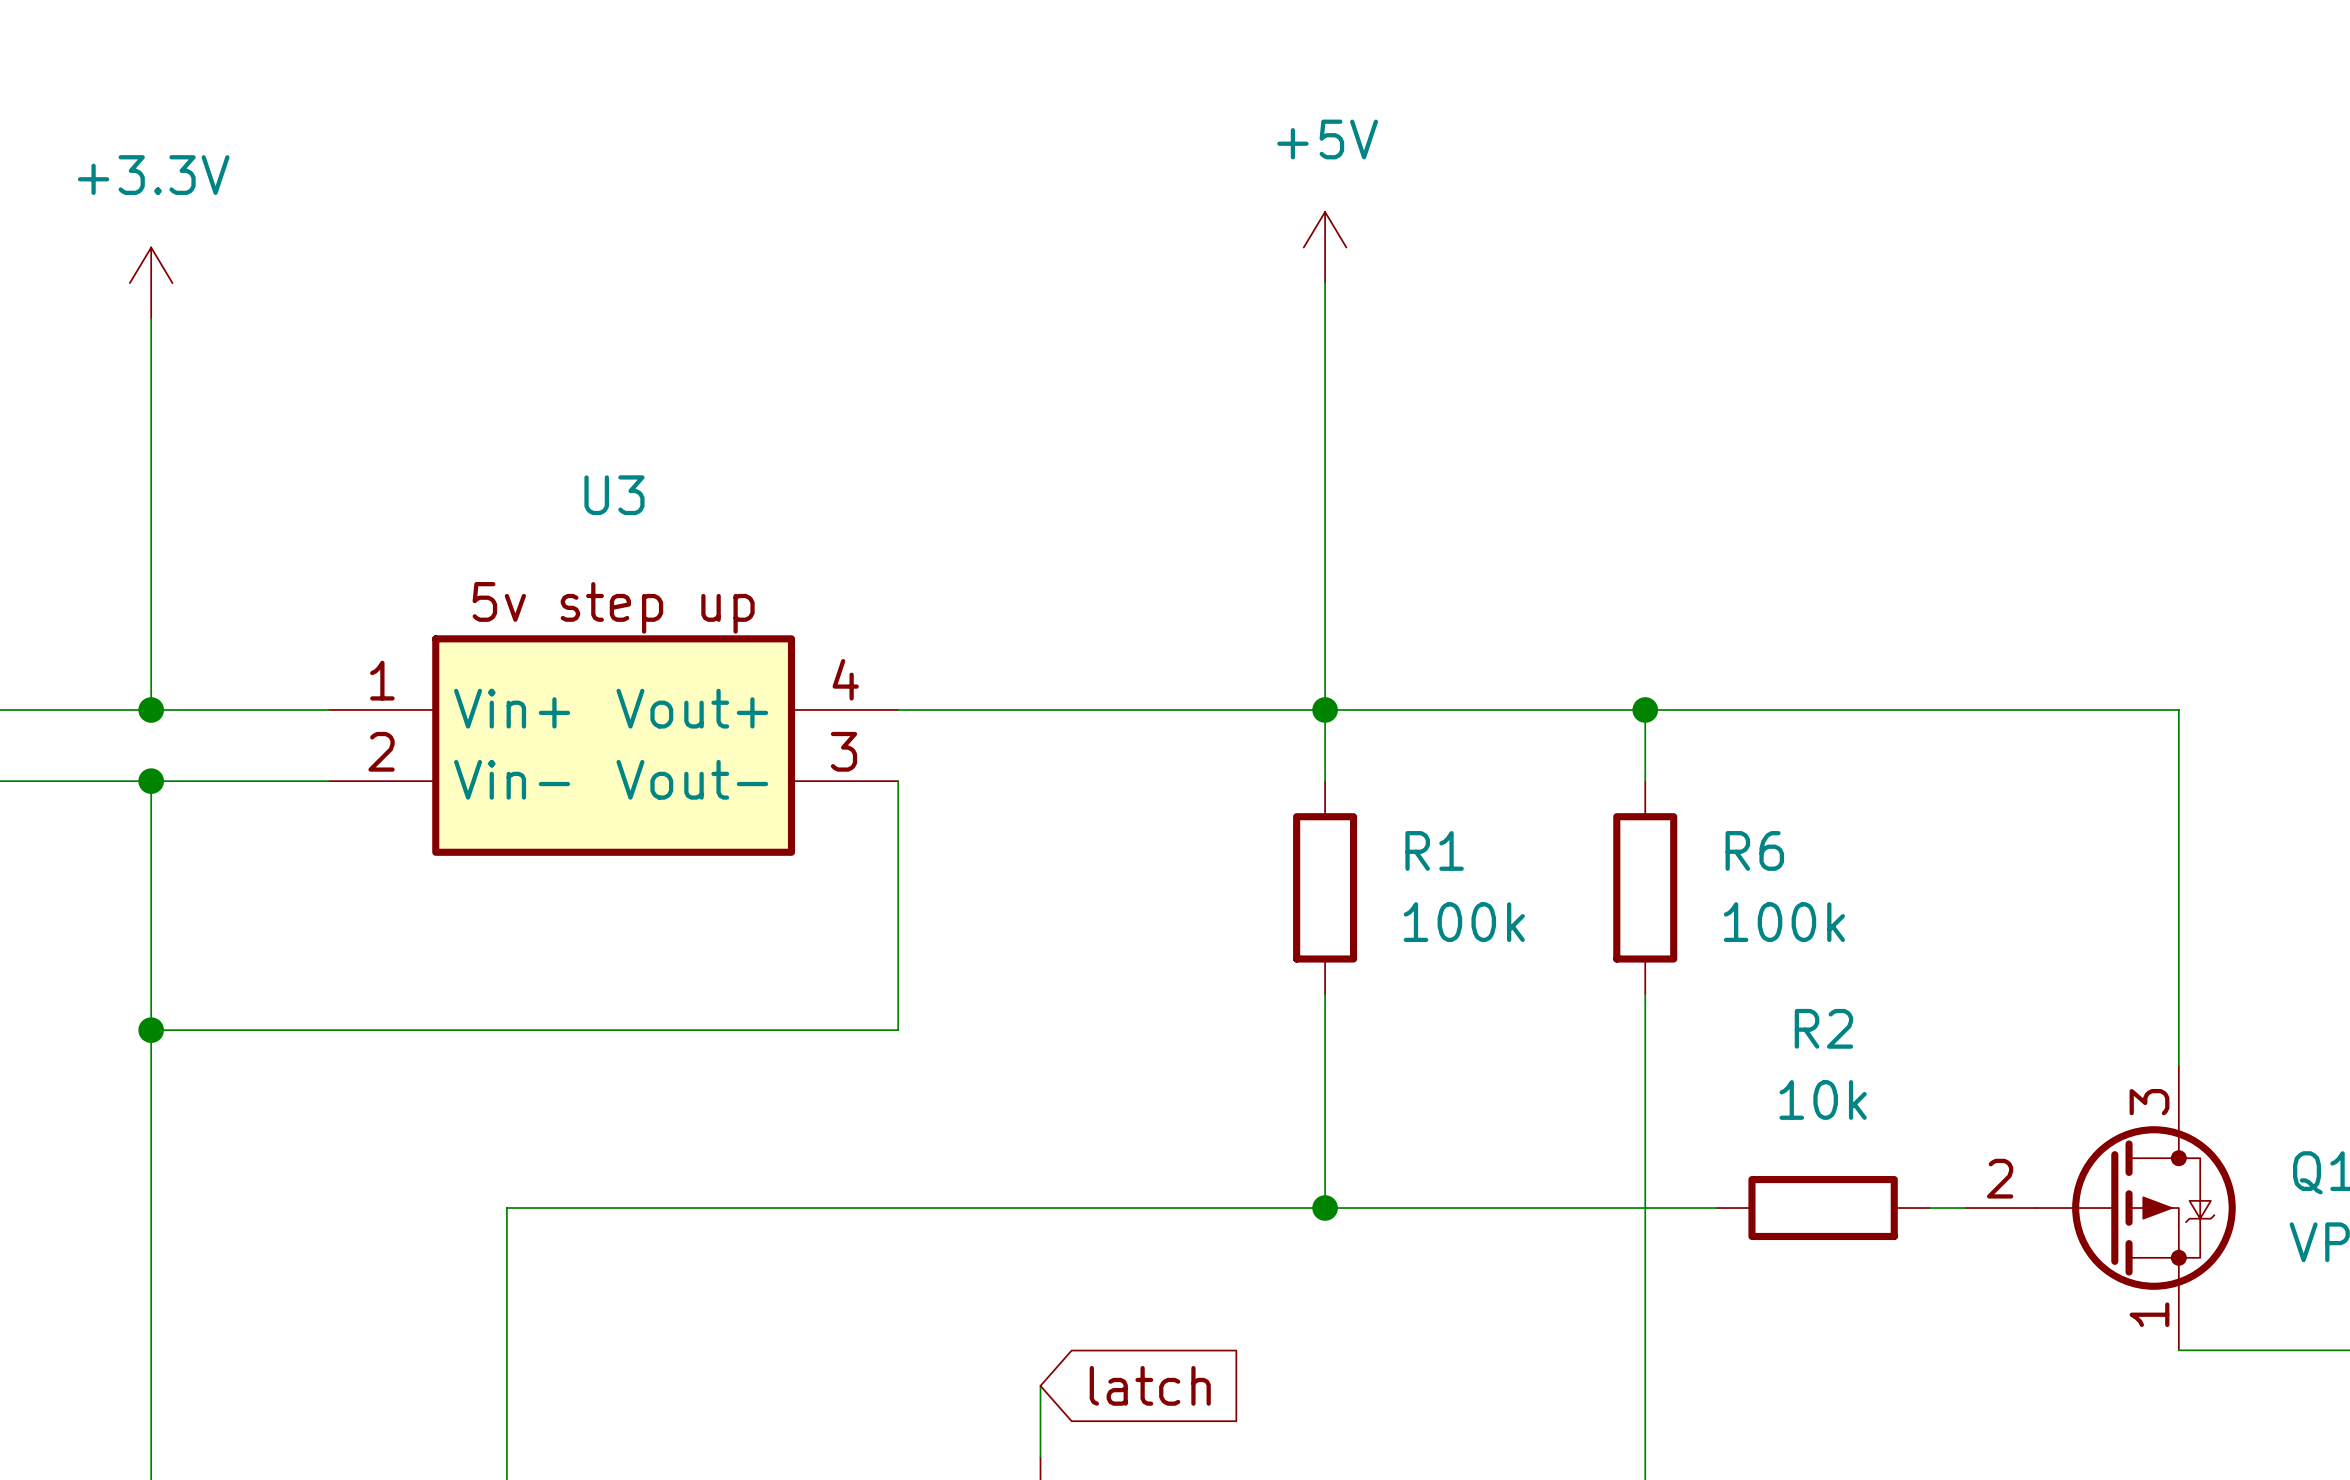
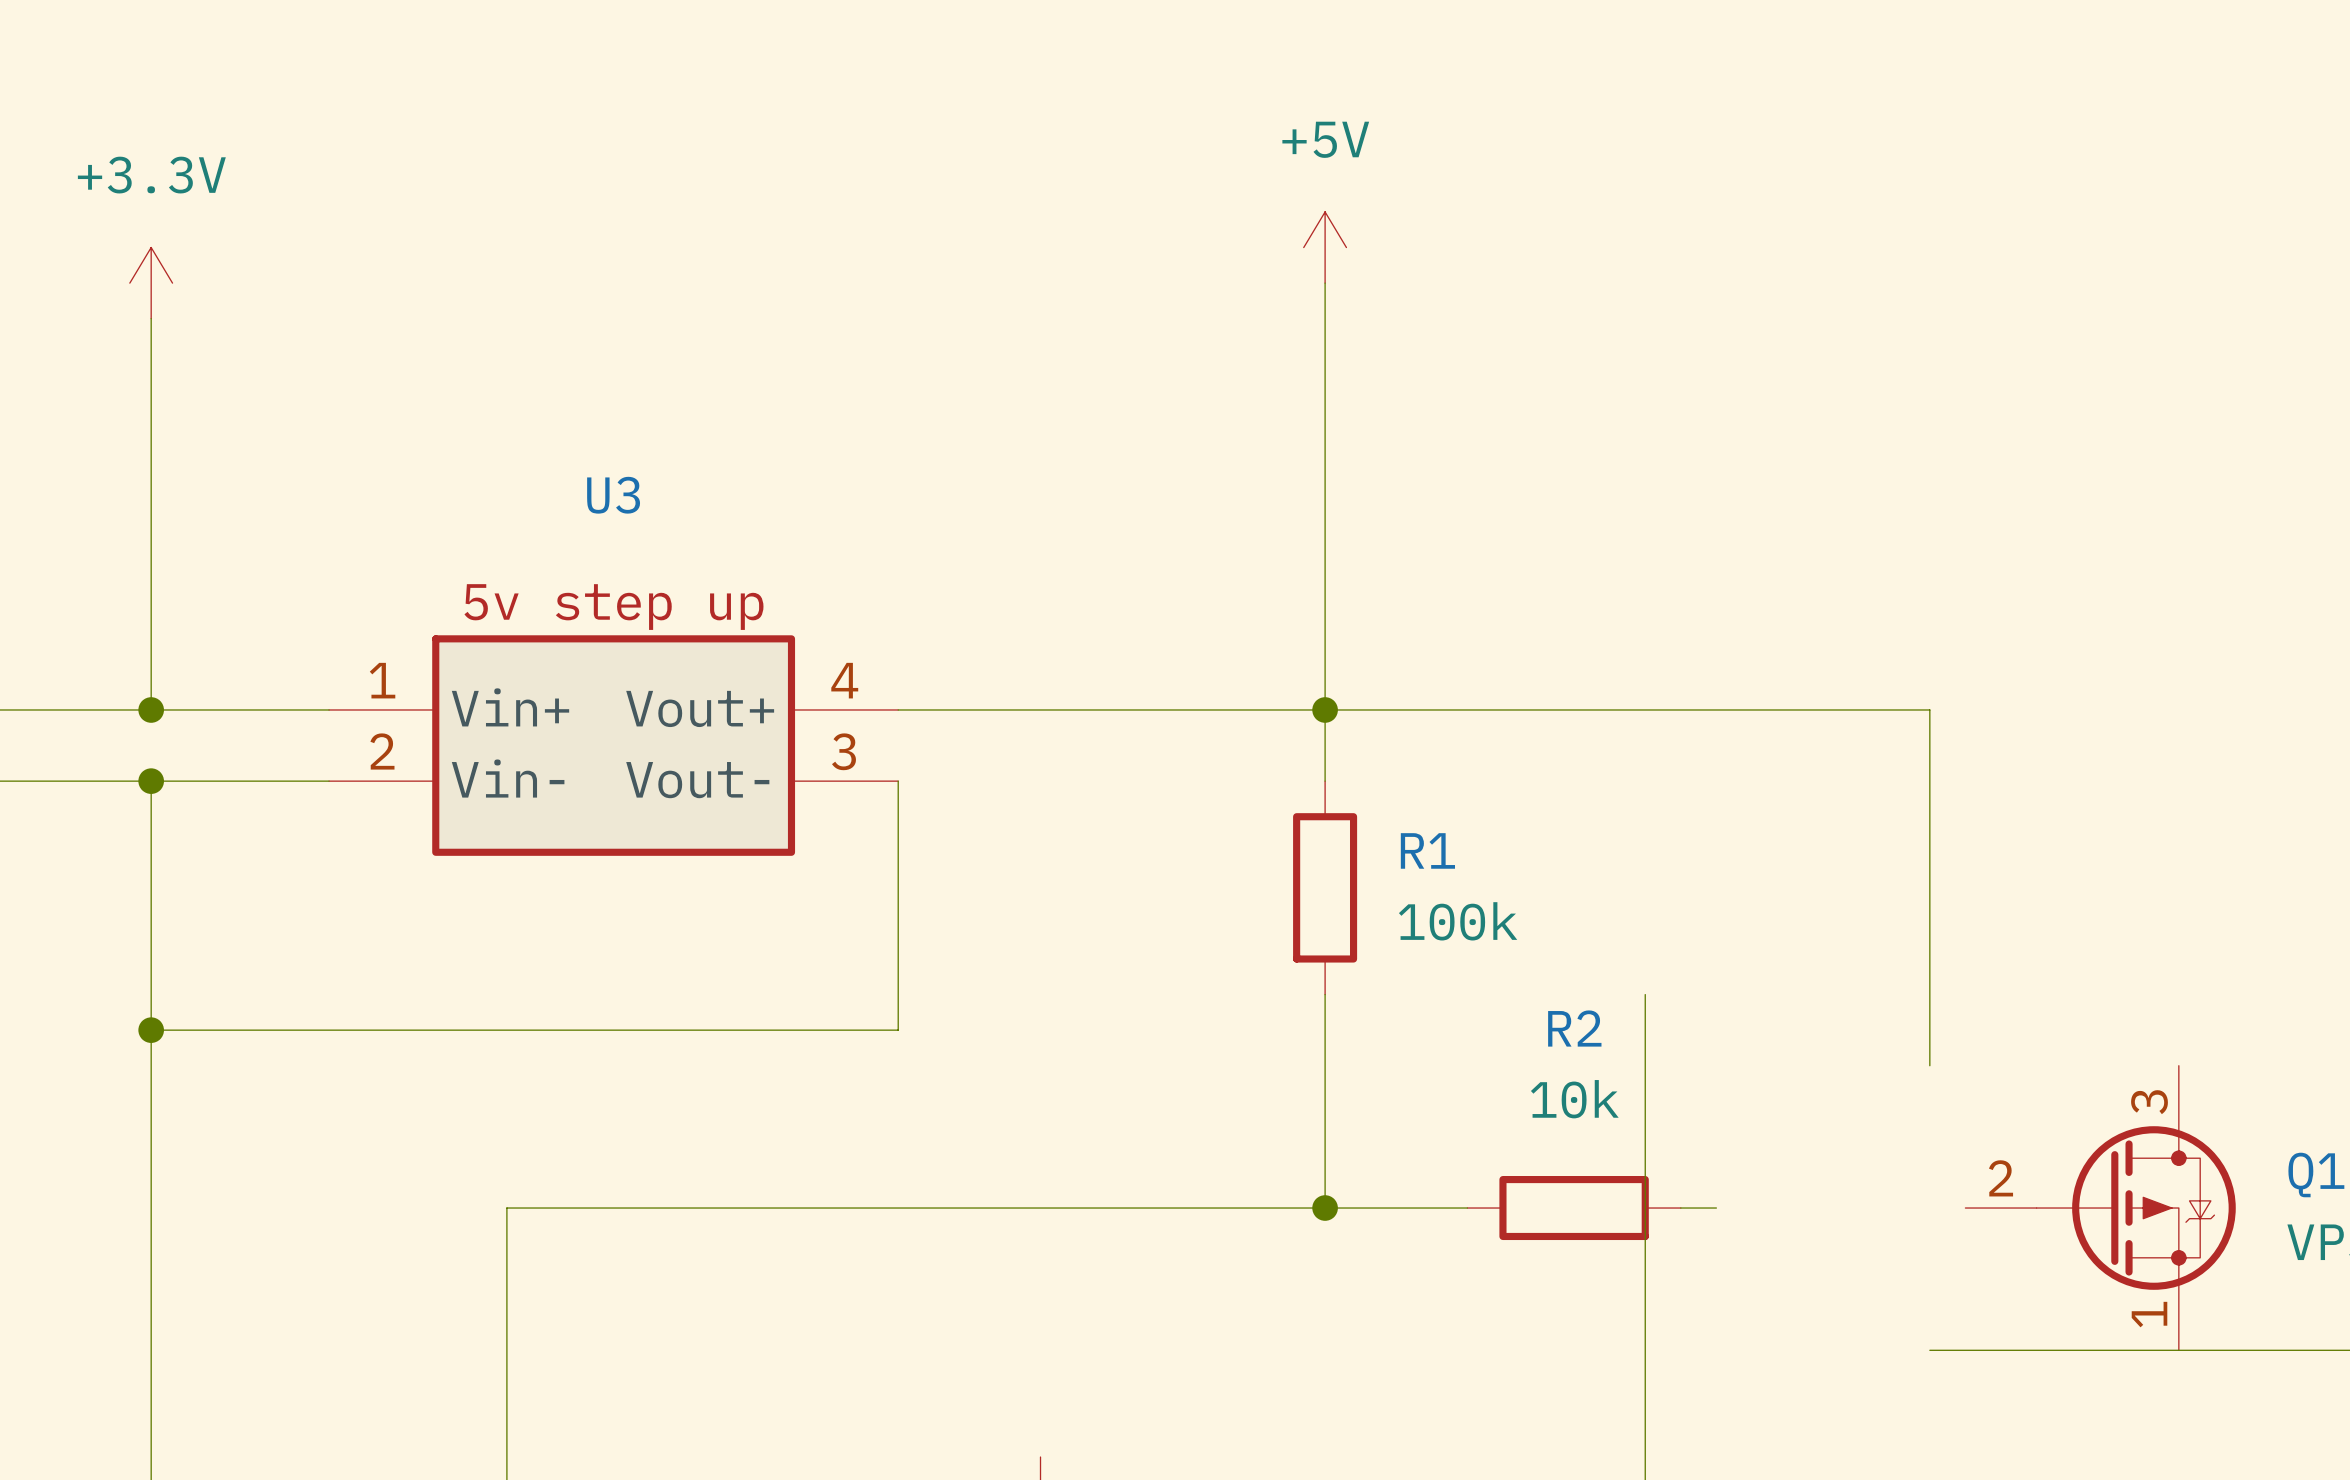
wire: (1645, 709) (1645, 781) -> none
junction: (1645, 709) -> none
wire: (1929, 709) (2178, 709) (2178, 1065) -> (1929, 709) (1929, 1065)
R6: 100k (1645, 887) -> none
wire: (1467, 1208) (1680, 1208) -> none
R2 position: (1823, 1208) -> (1574, 1208)
wire: (1929, 1208) (1965, 1208) -> none
wire: none -> (1929, 1350) (2178, 1350)
wire: (1040, 1385) (1040, 1457) -> none
global label: latch (1150, 1385) -> none

